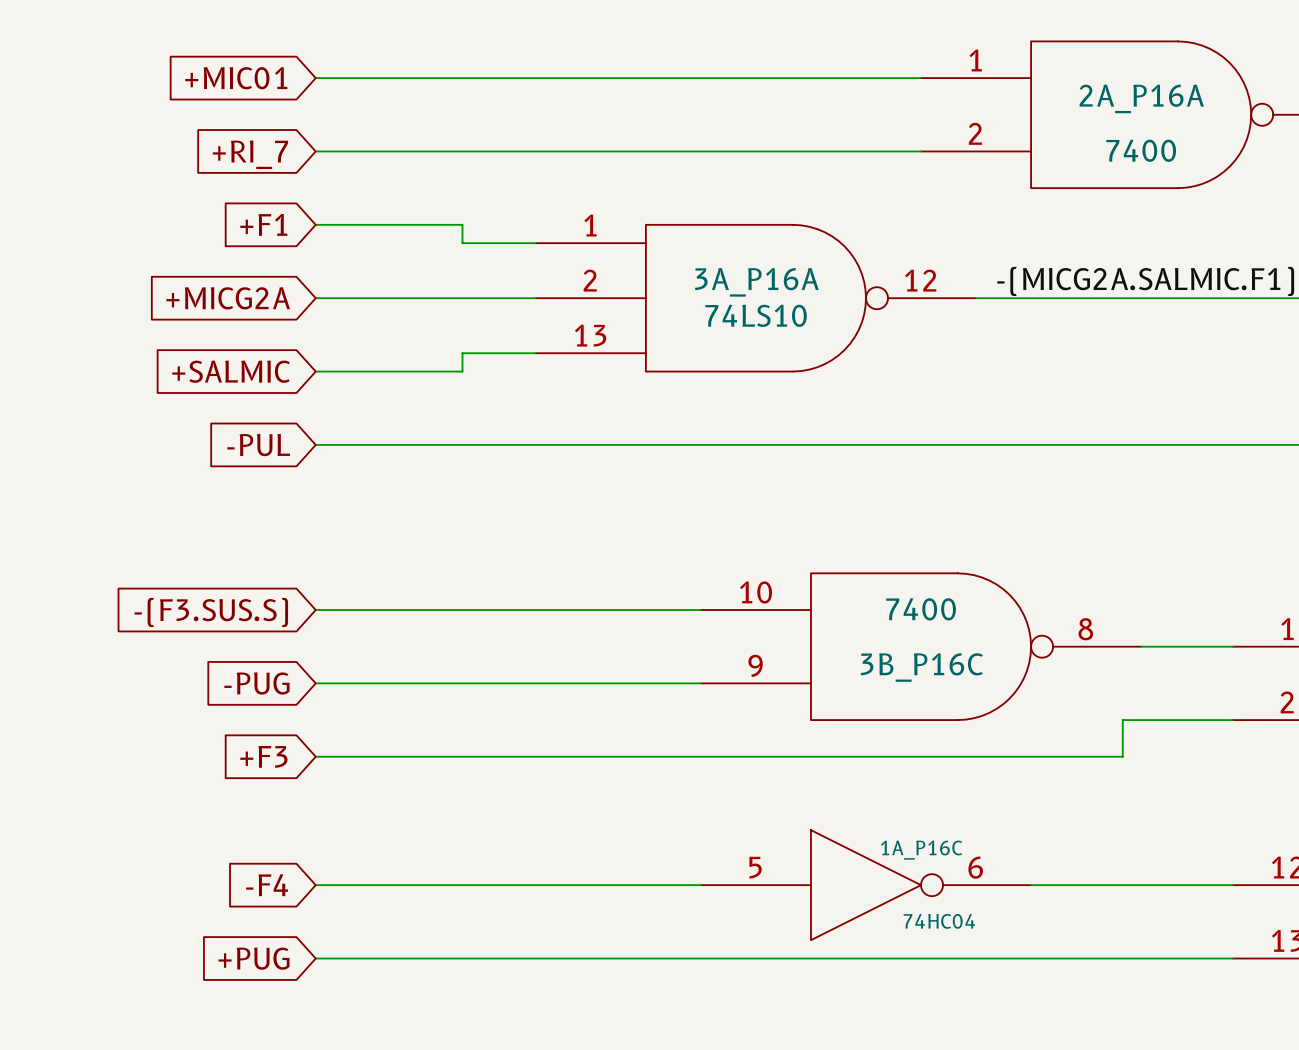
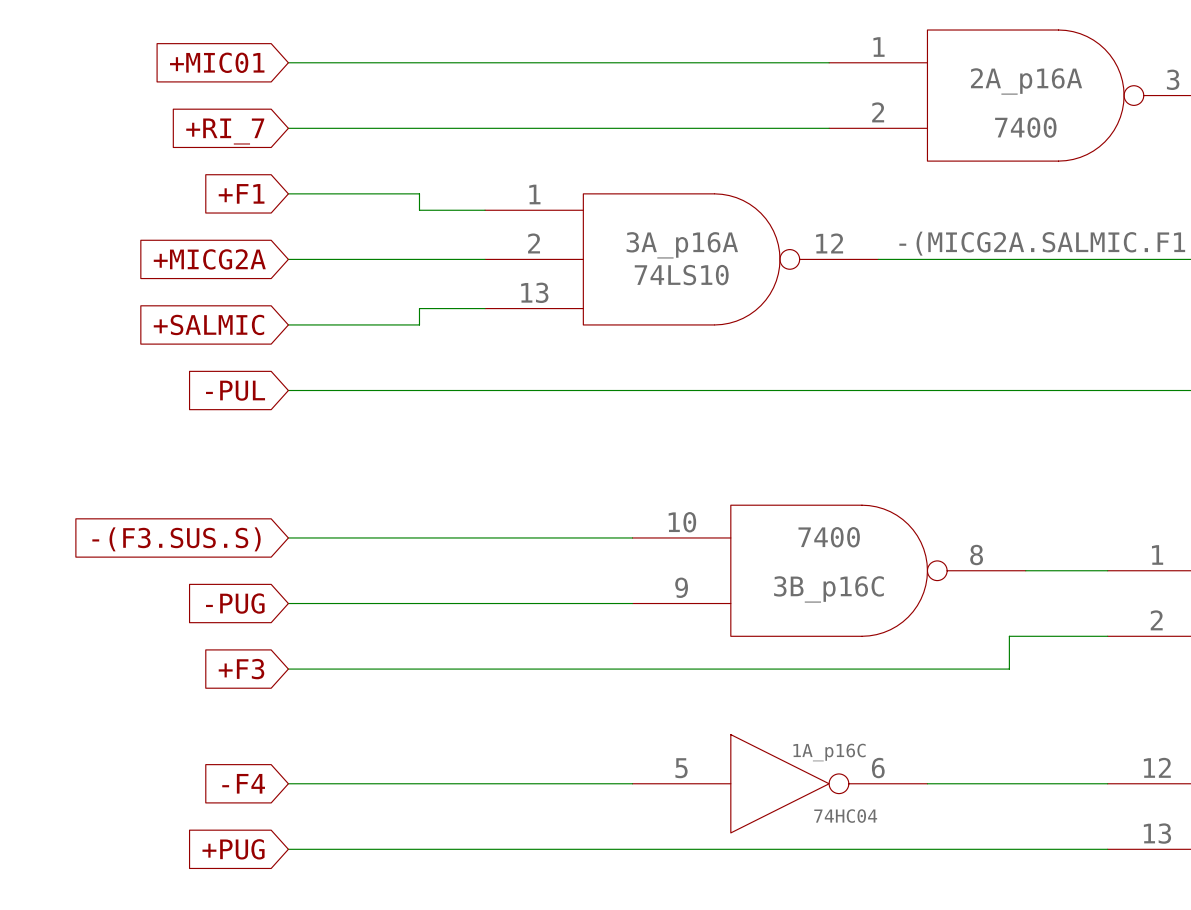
2A_P16A name: 2A_P16A (1141, 98) -> 2A_p16A (1026, 81)
3A_P16A name: 3A_P16A (756, 282) -> 3A_p16A (682, 245)
3B_P16C name: 3B_P16C (921, 667) -> 3B_p16C (828, 589)
1A_P16C name: 1A_P16C (921, 850) -> 1A_p16C (829, 752)

